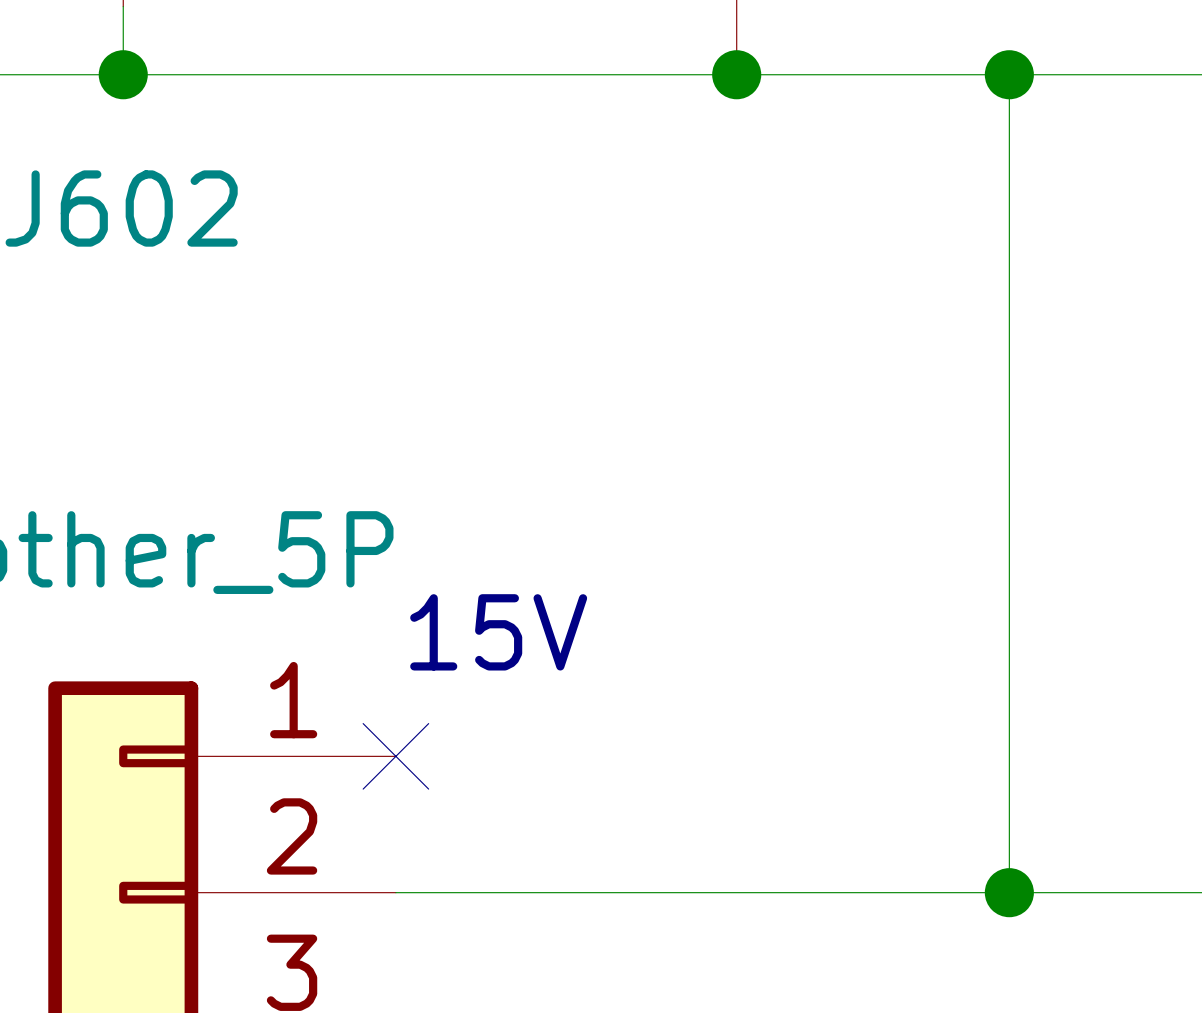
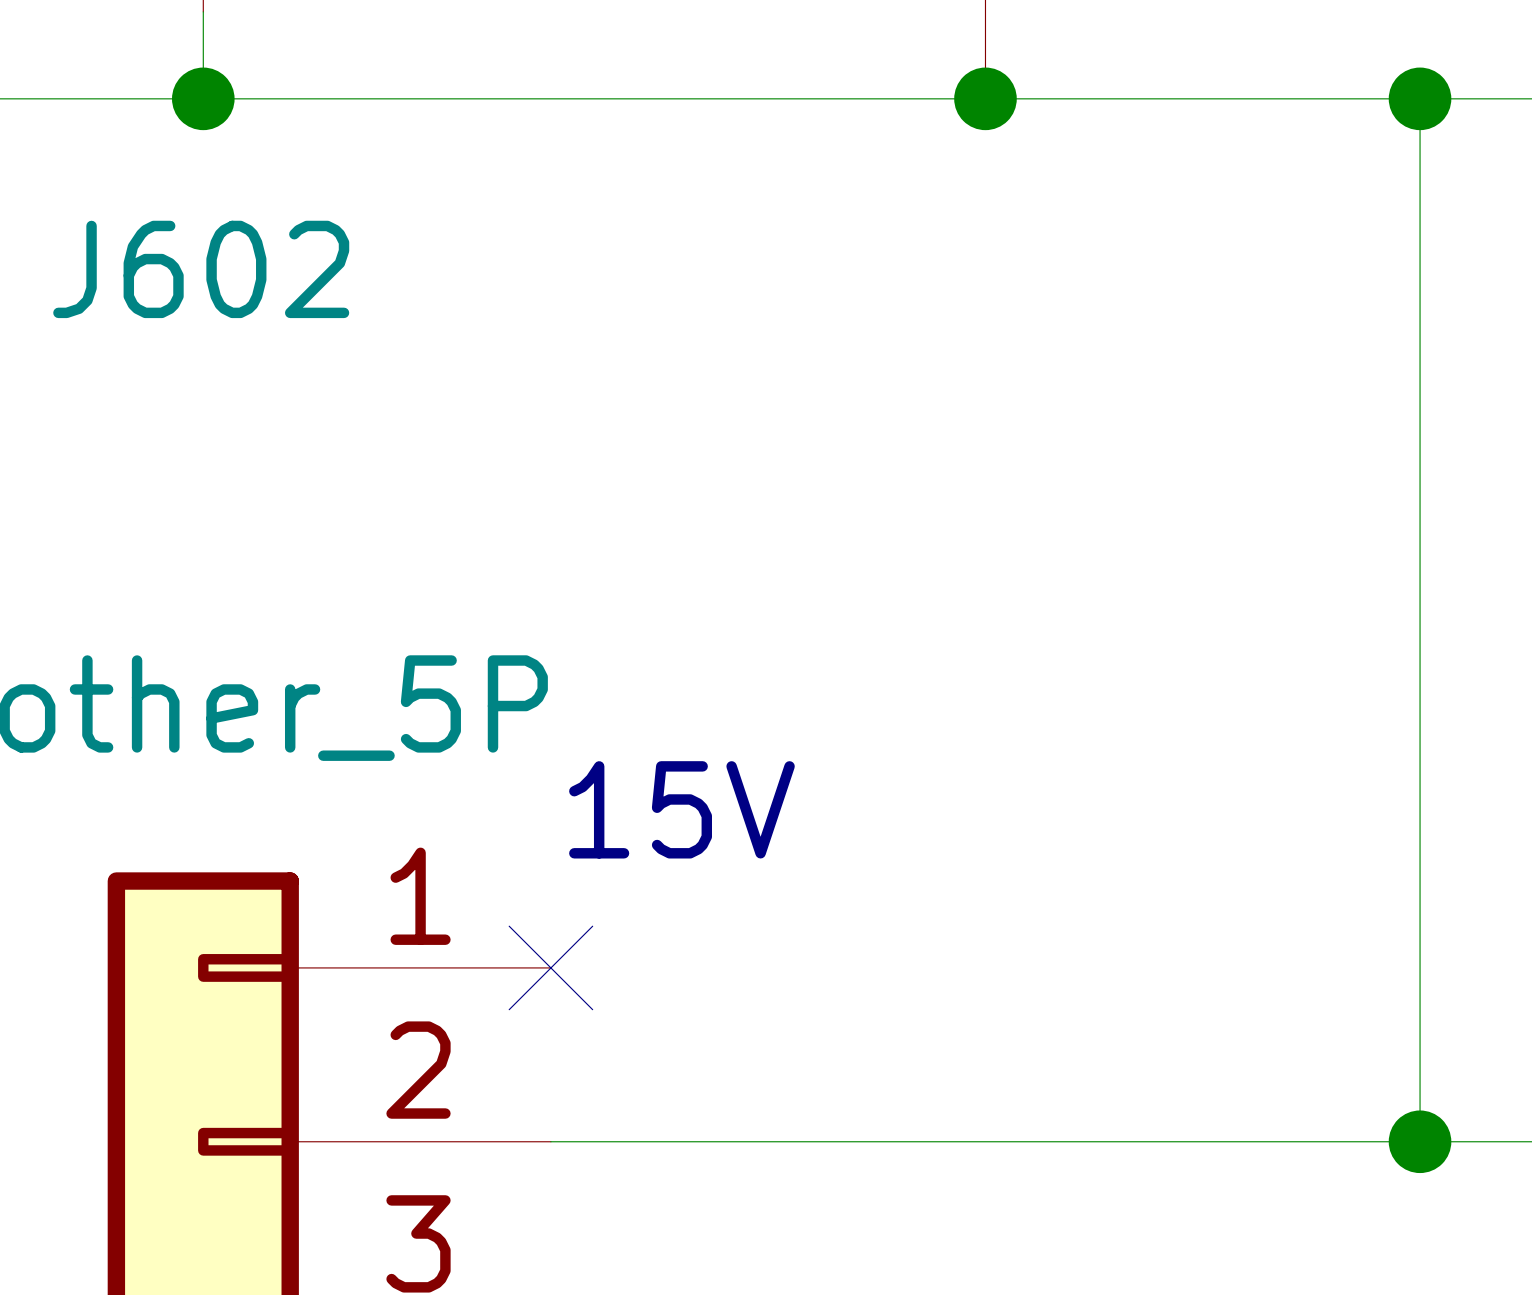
wire: (1009, 74) (1009, 892) -> (1420, 98) (1420, 1141)
junction position: (1009, 74) -> (1420, 98)
junction position: (1009, 892) -> (1420, 1141)

